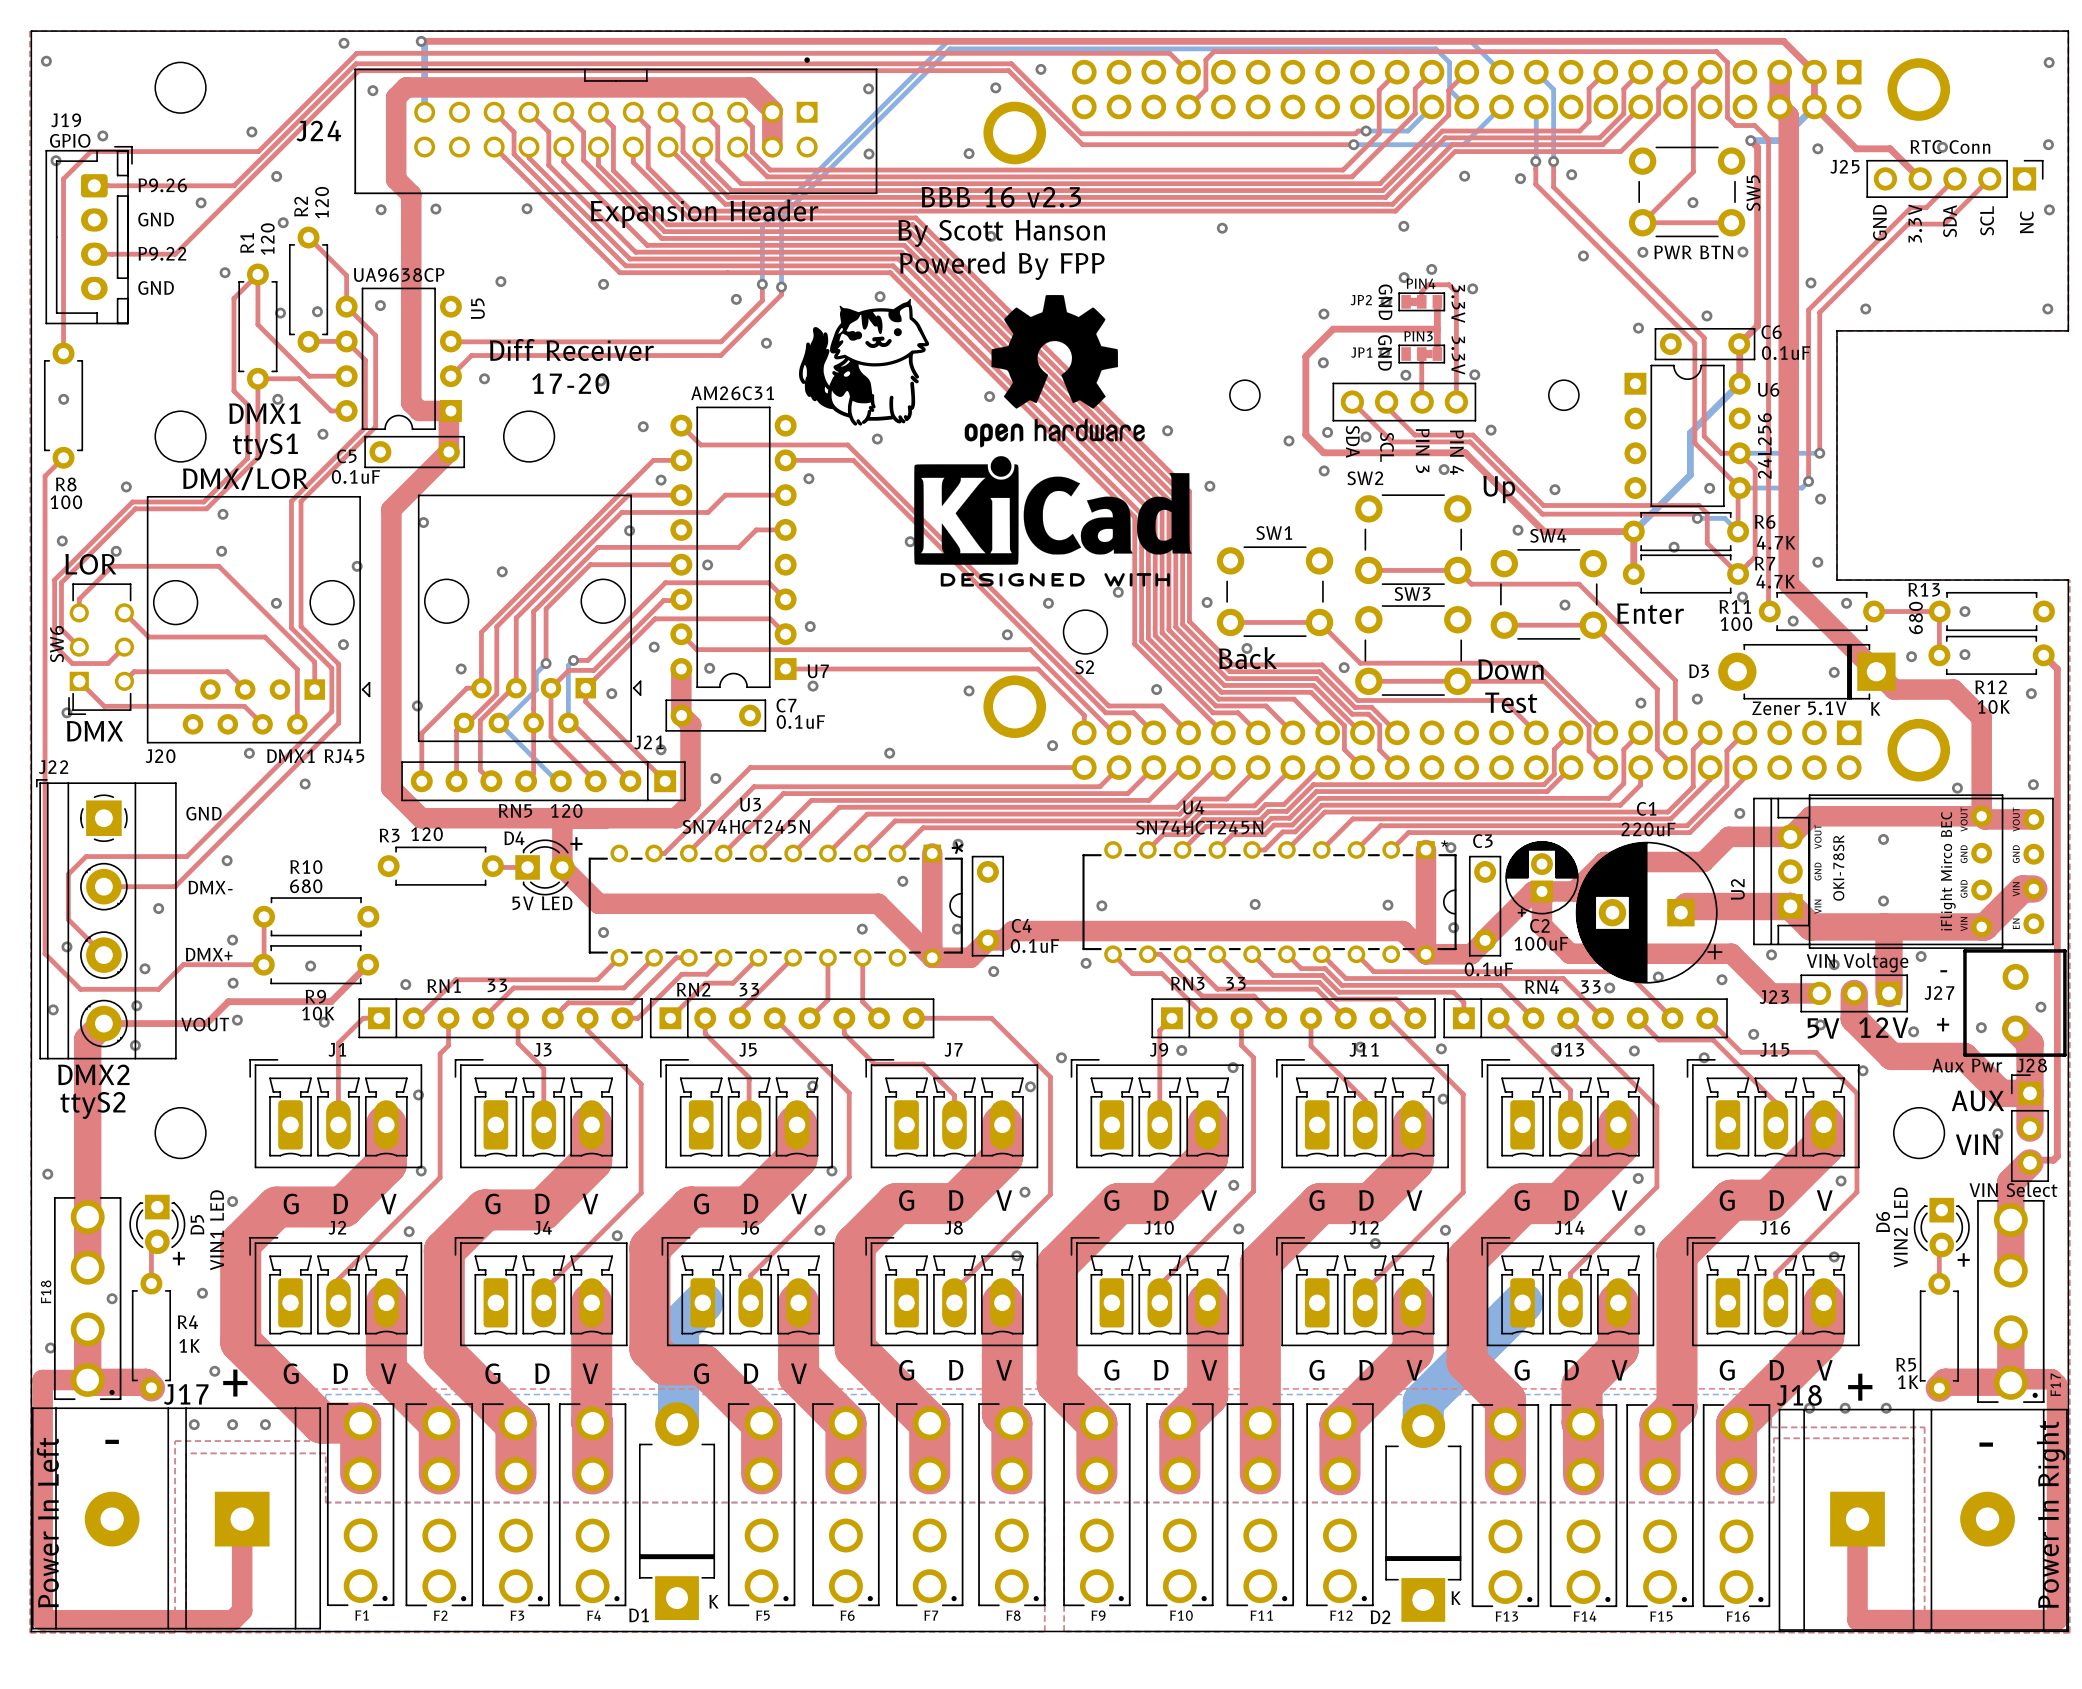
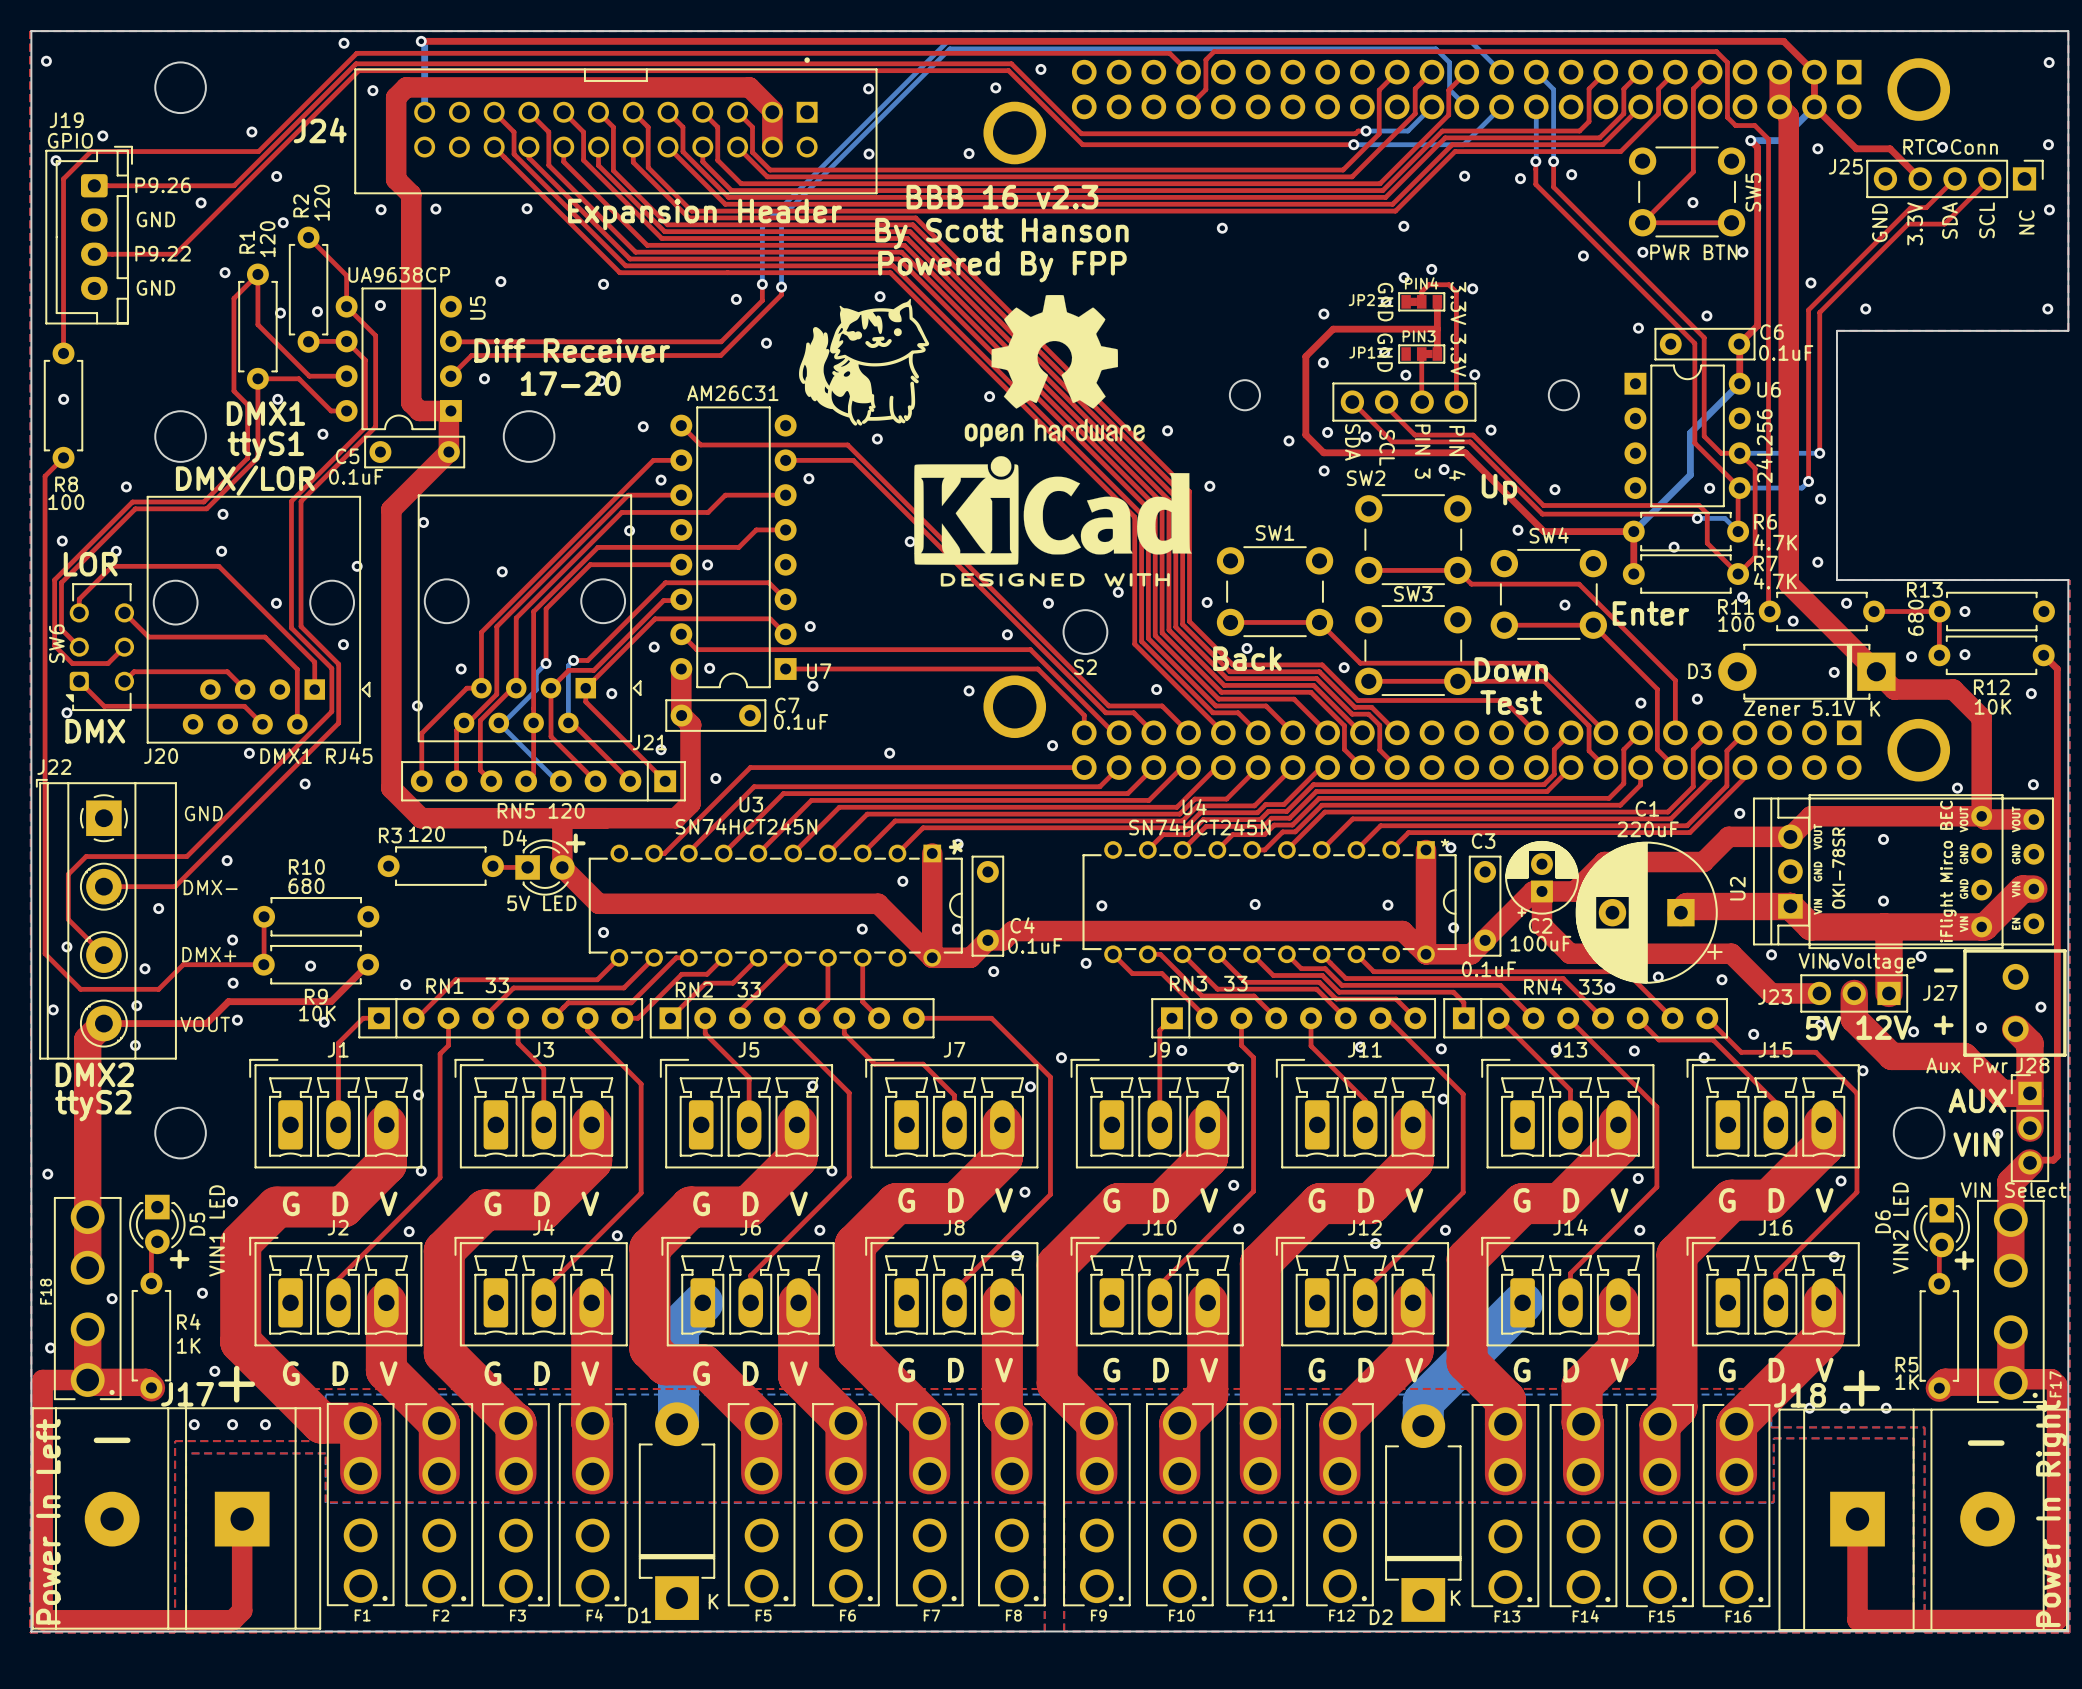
SW6 footprint: [68, 583, 135, 716] -> [65, 583, 135, 711]

